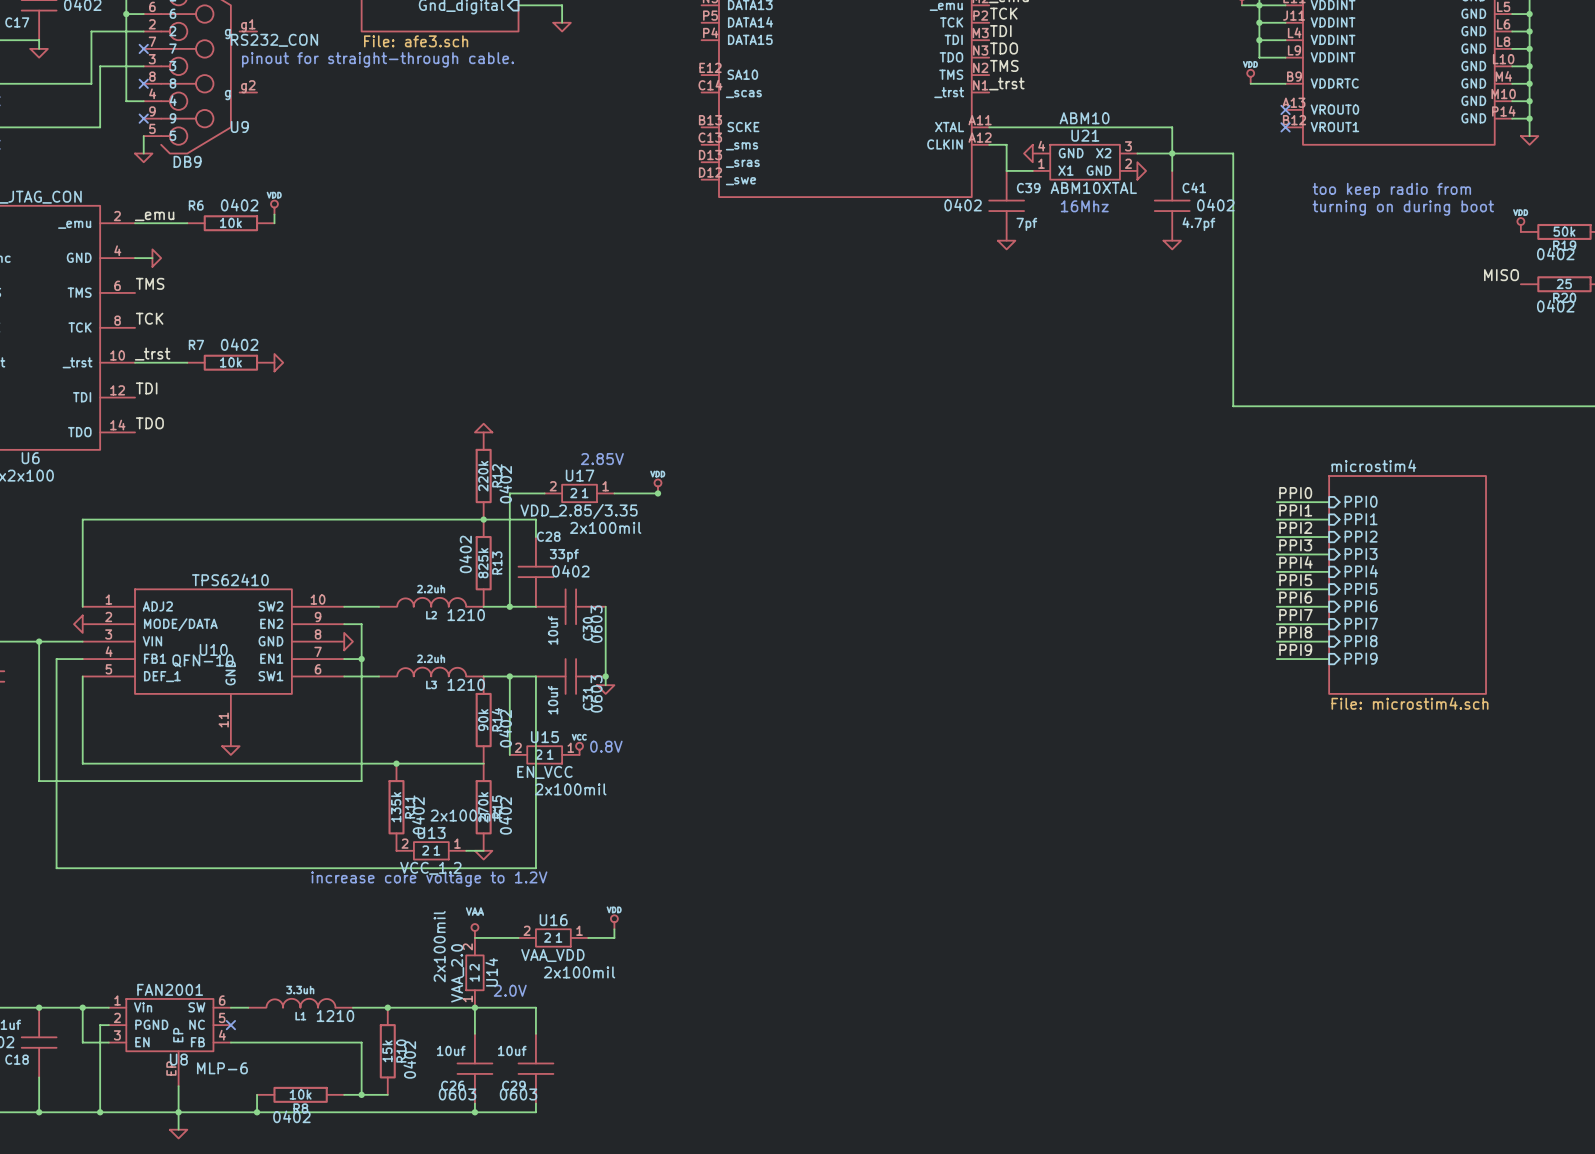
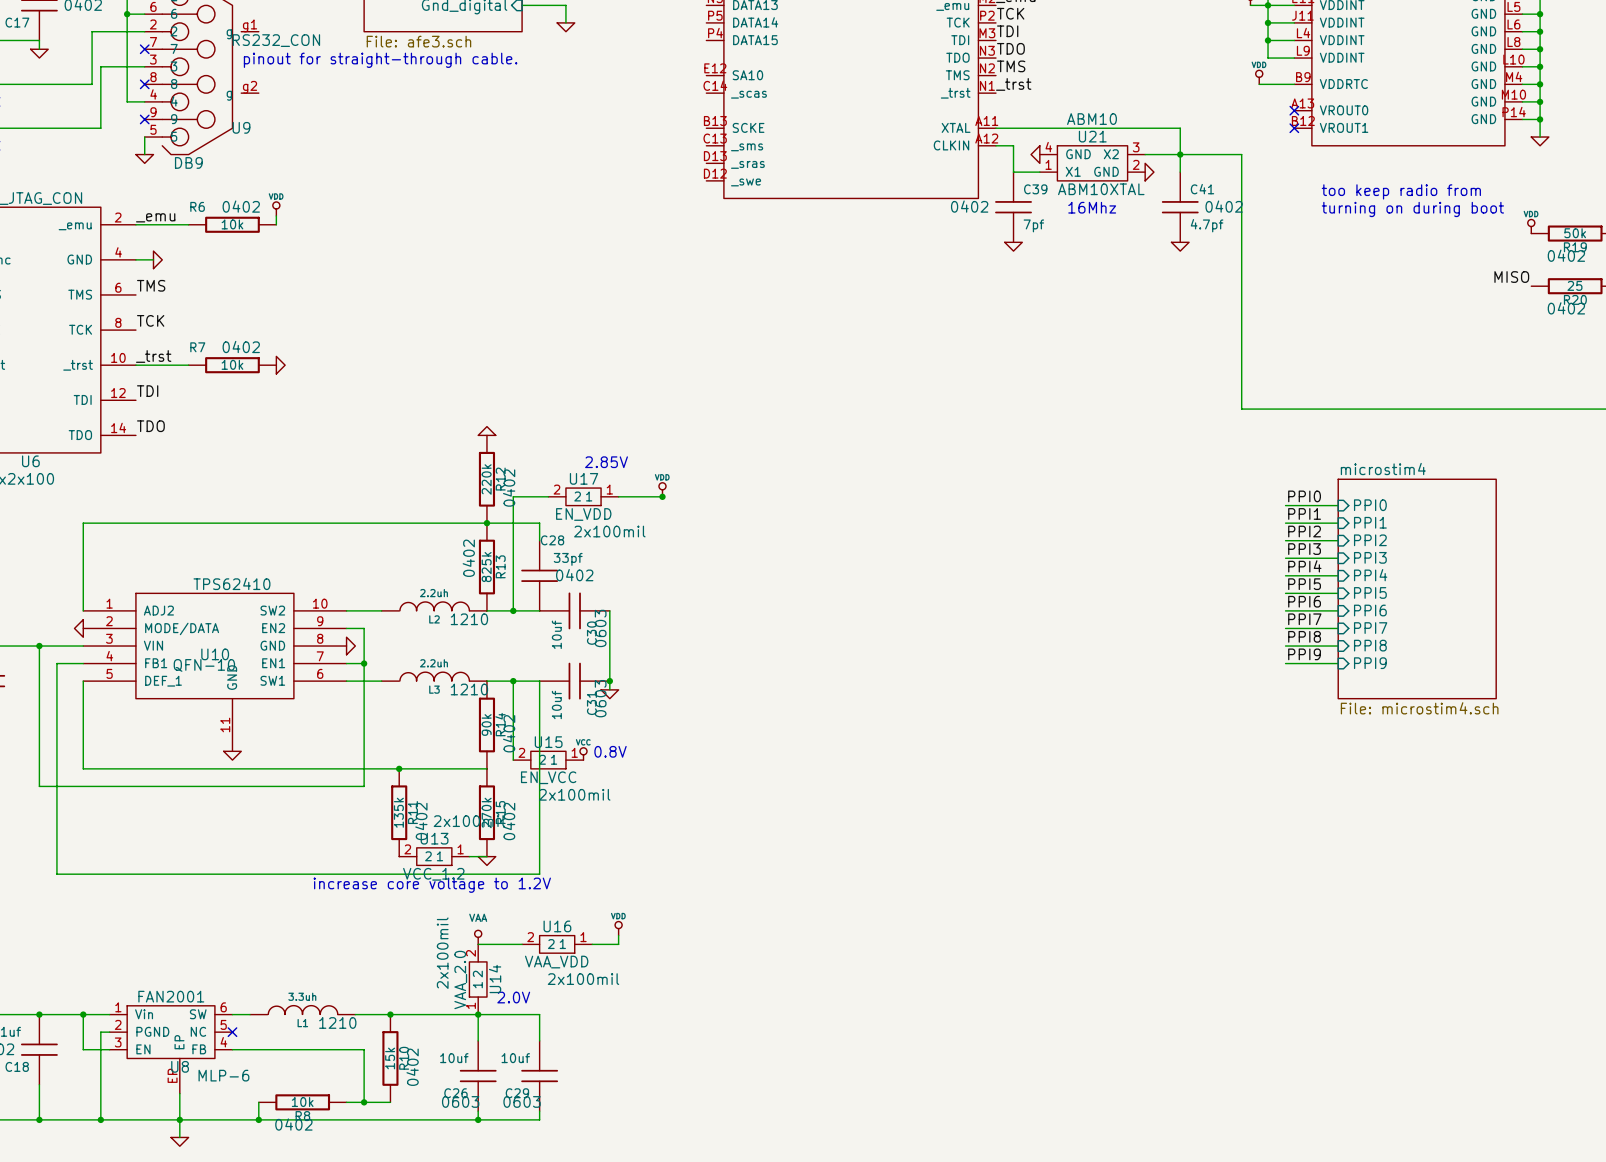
U17 value: VDD_2.85/3.35 (579, 511) -> EN_VDD (583, 514)

